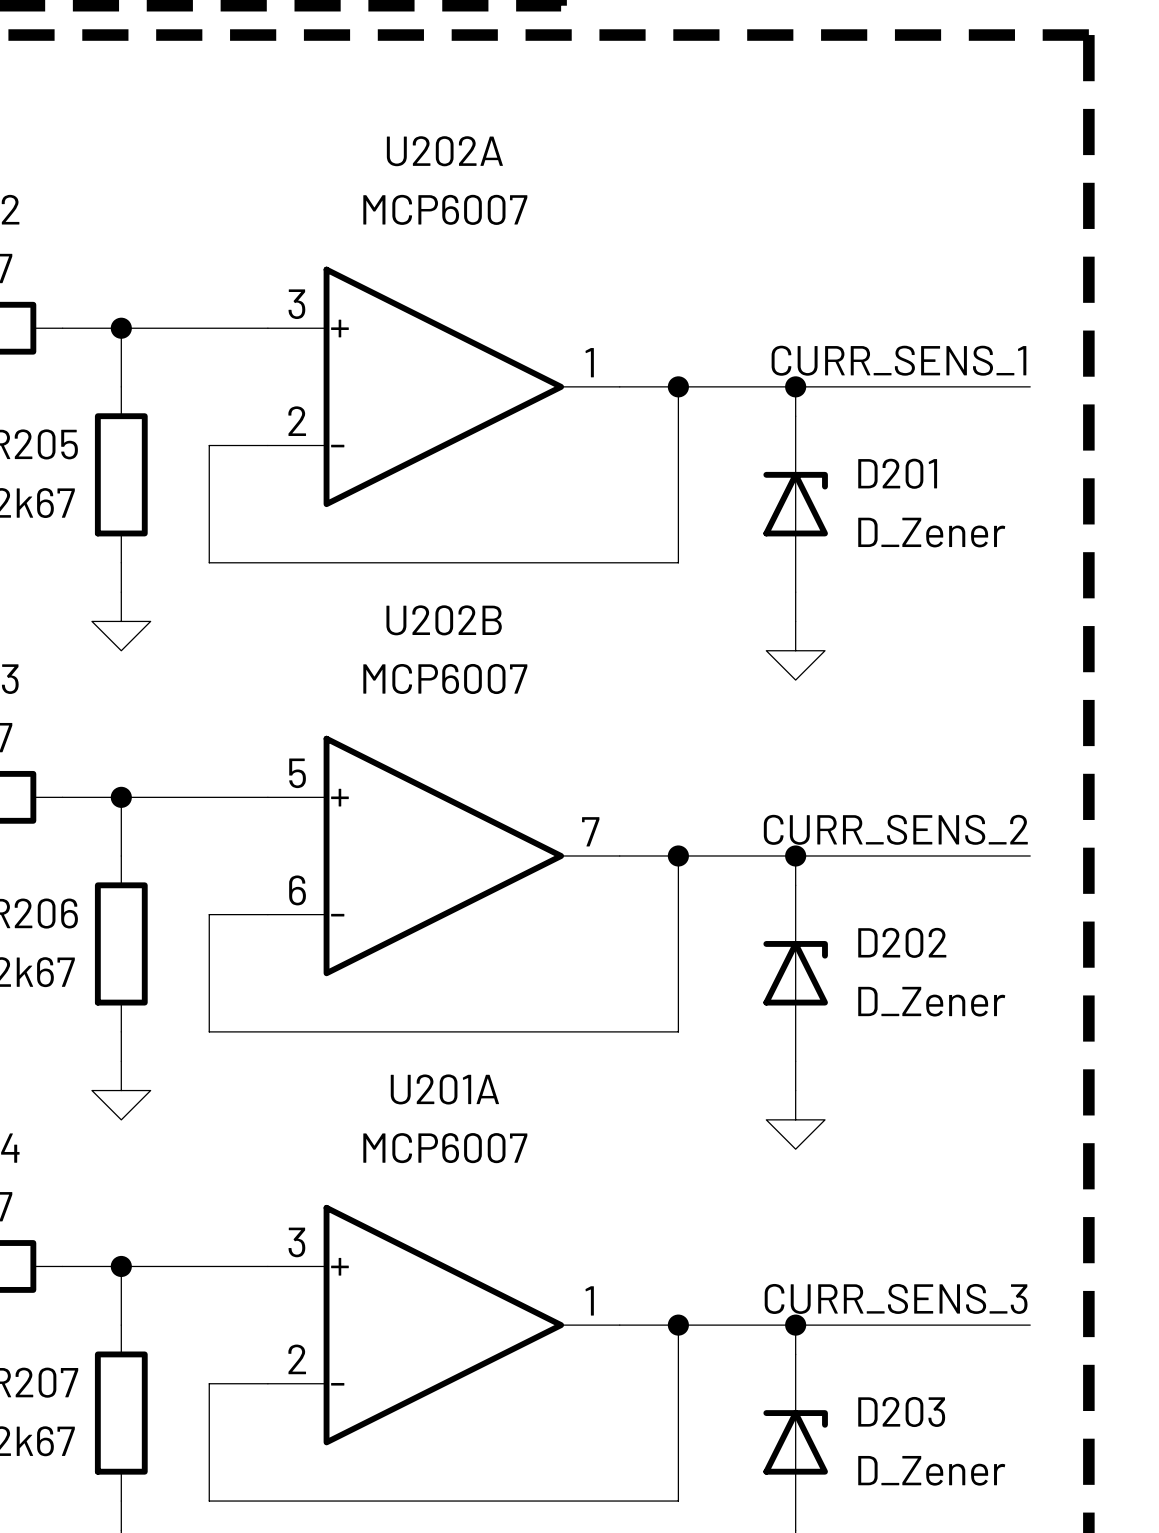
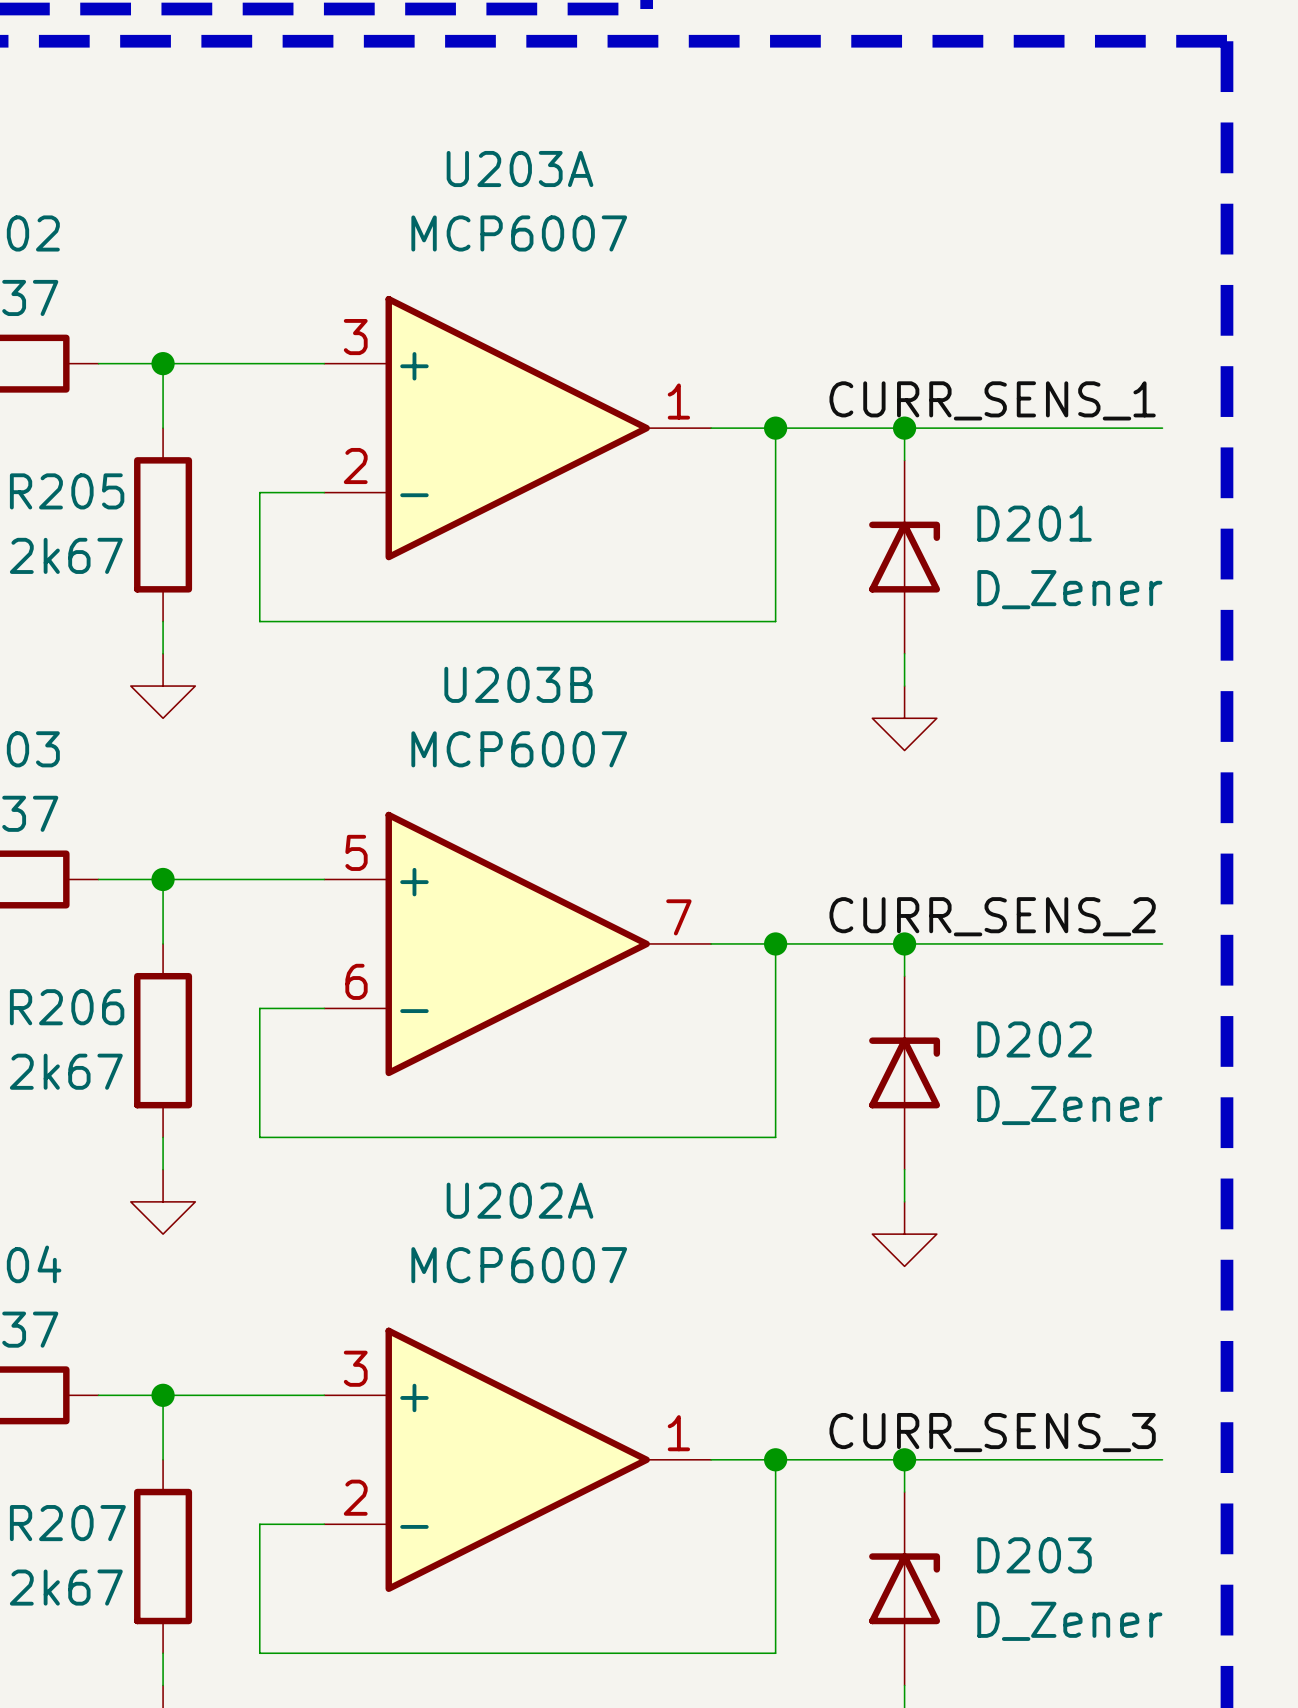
U202A name: U202A (444, 151) -> U203A (520, 169)
U202B name: U202B (444, 620) -> U203B (518, 684)
U201A name: U201A (444, 1089) -> U202A (520, 1200)

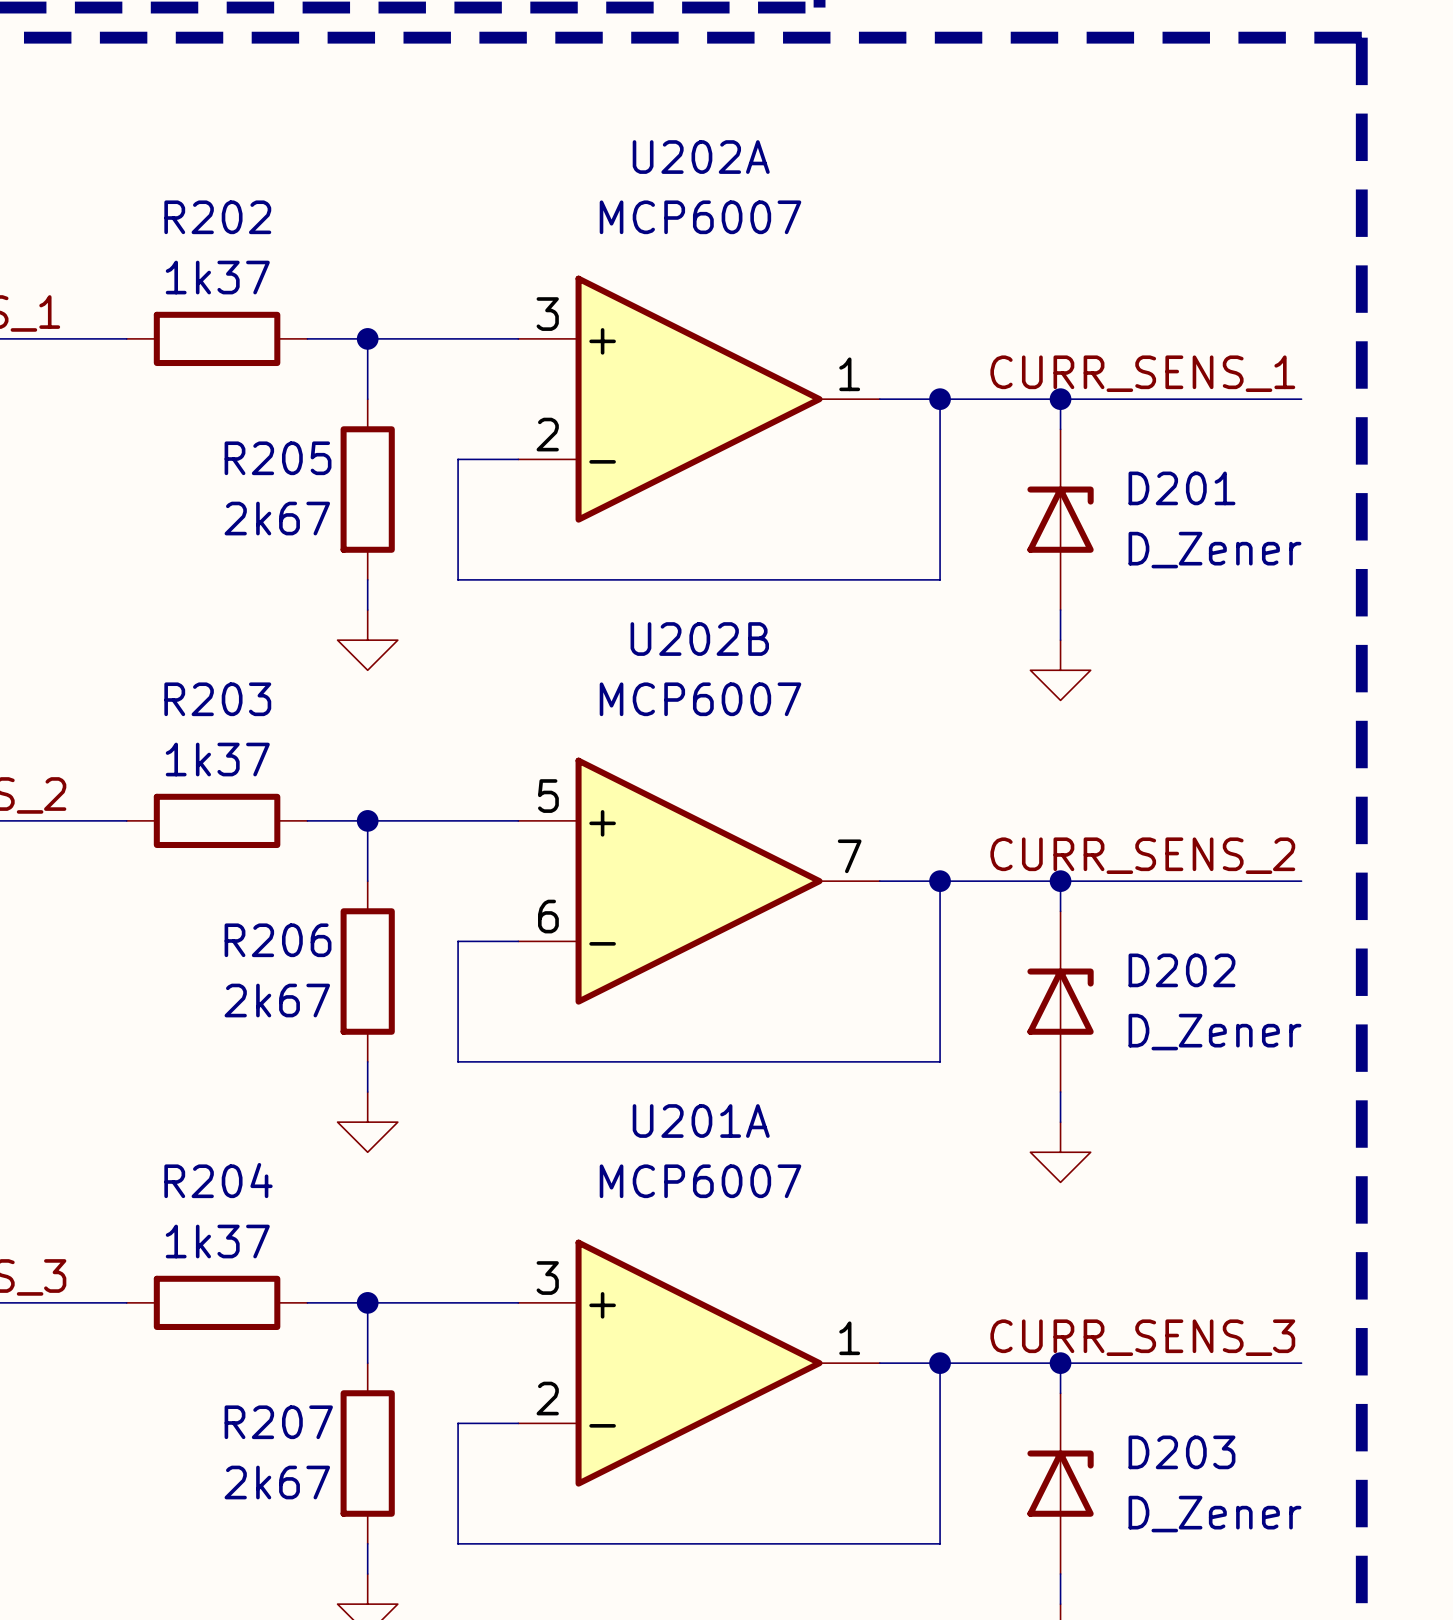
U203A name: U203A (520, 169) -> U202A (701, 157)
U203B name: U203B (518, 684) -> U202B (699, 639)
U202A name: U202A (520, 1200) -> U201A (701, 1121)

